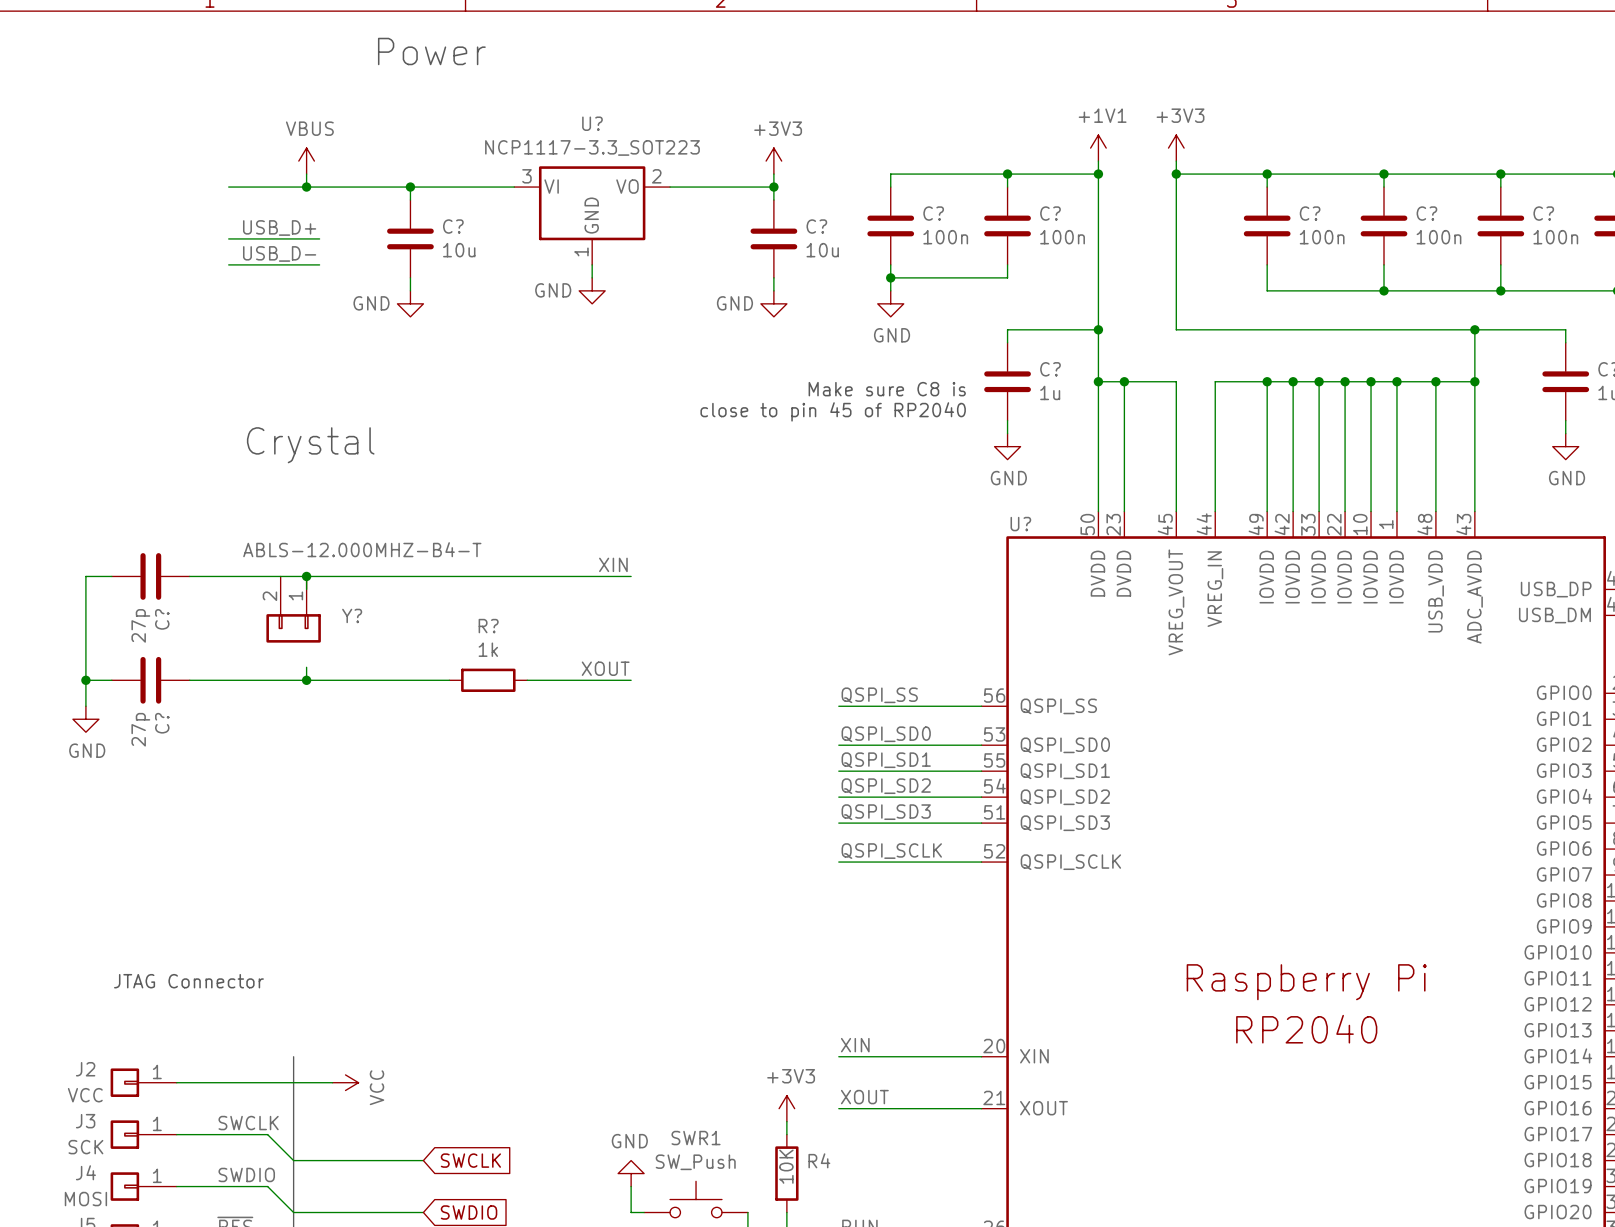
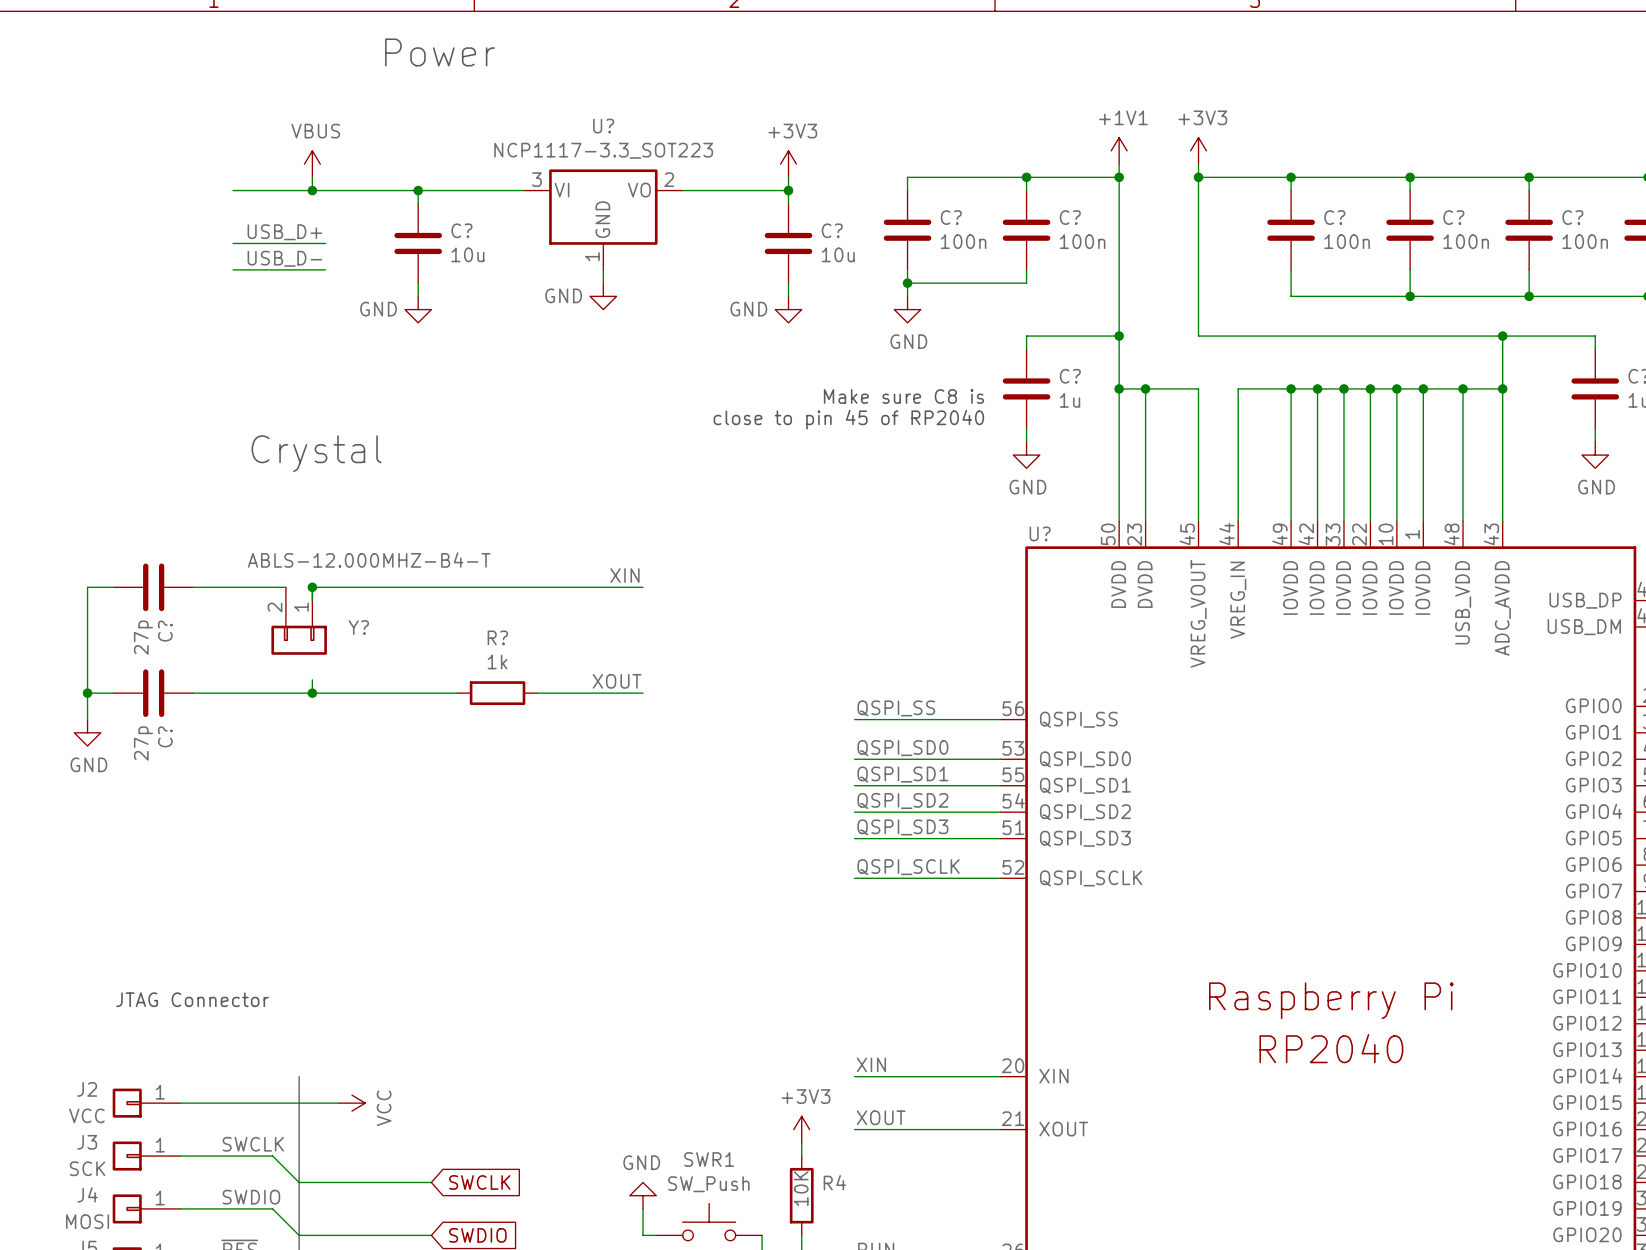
wire: (280, 576) (306, 576) -> none

